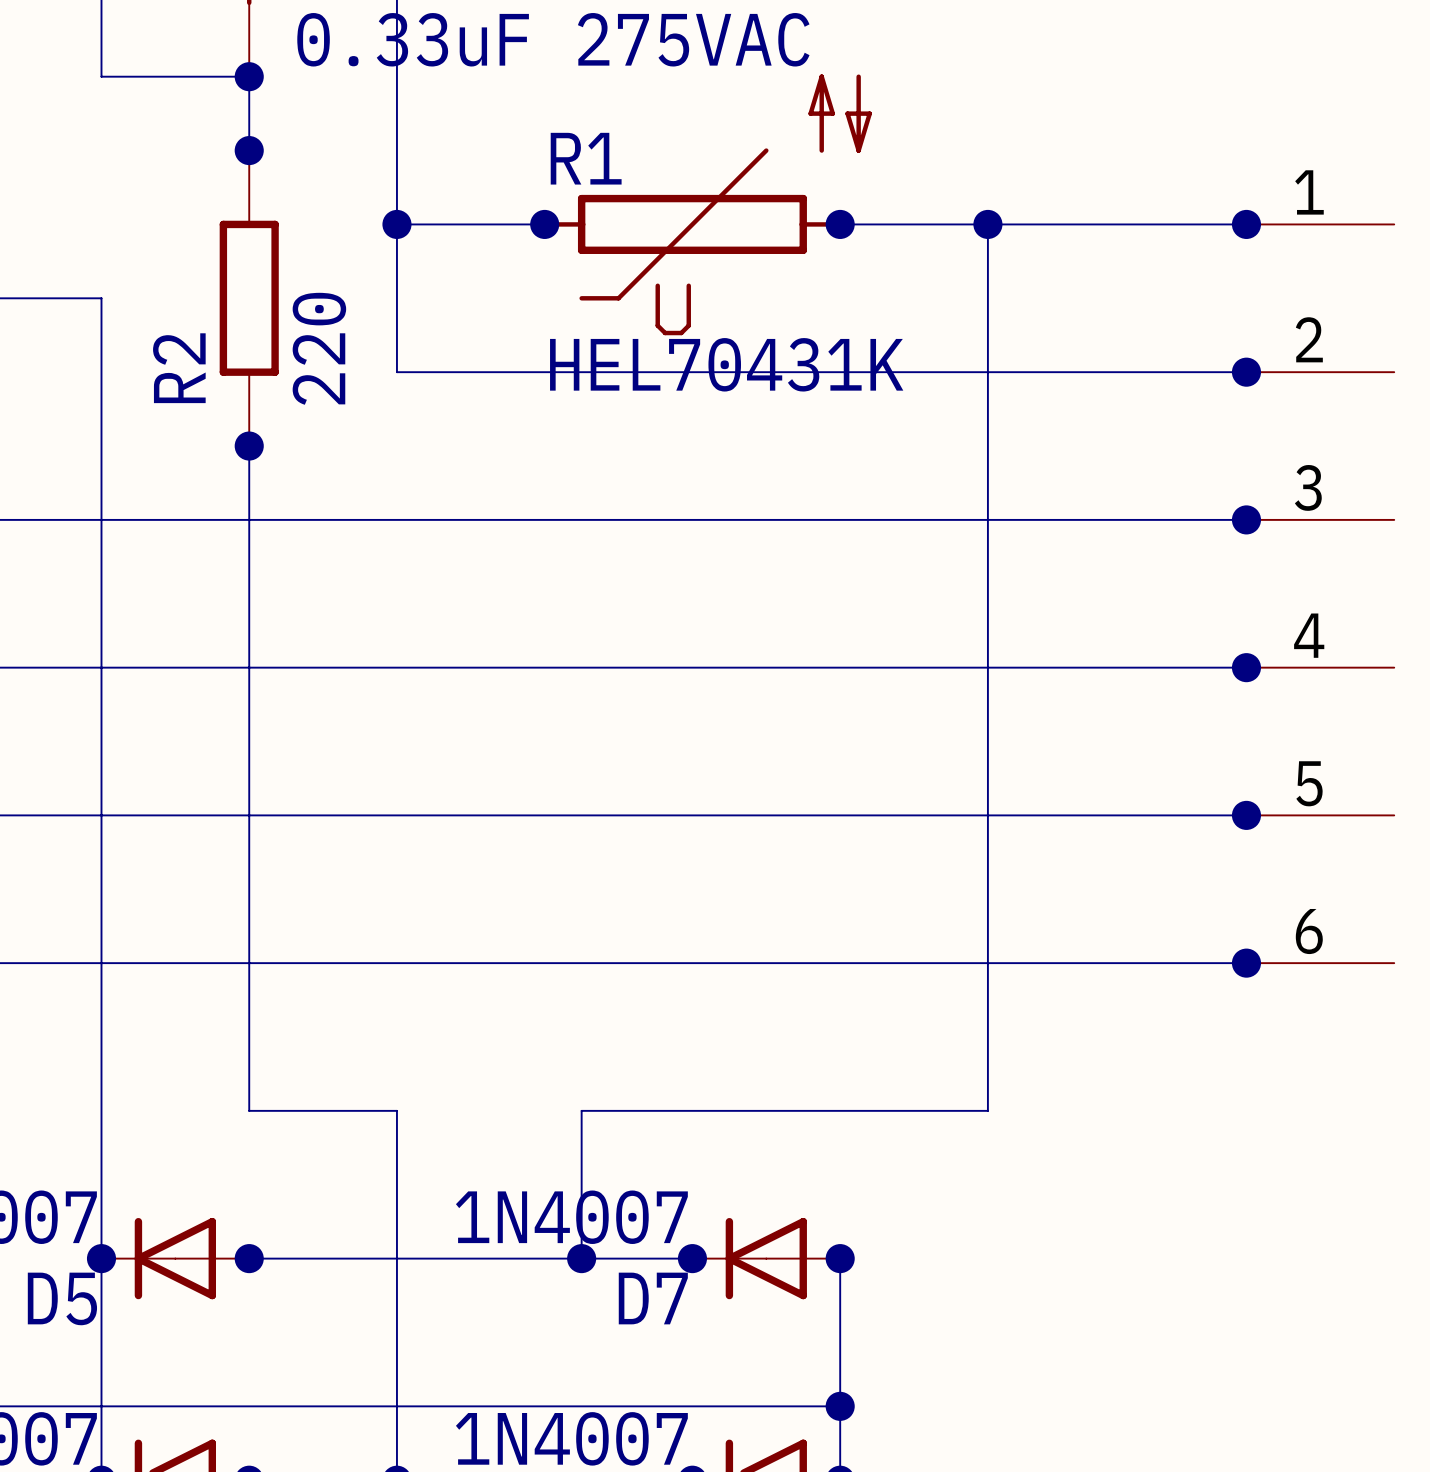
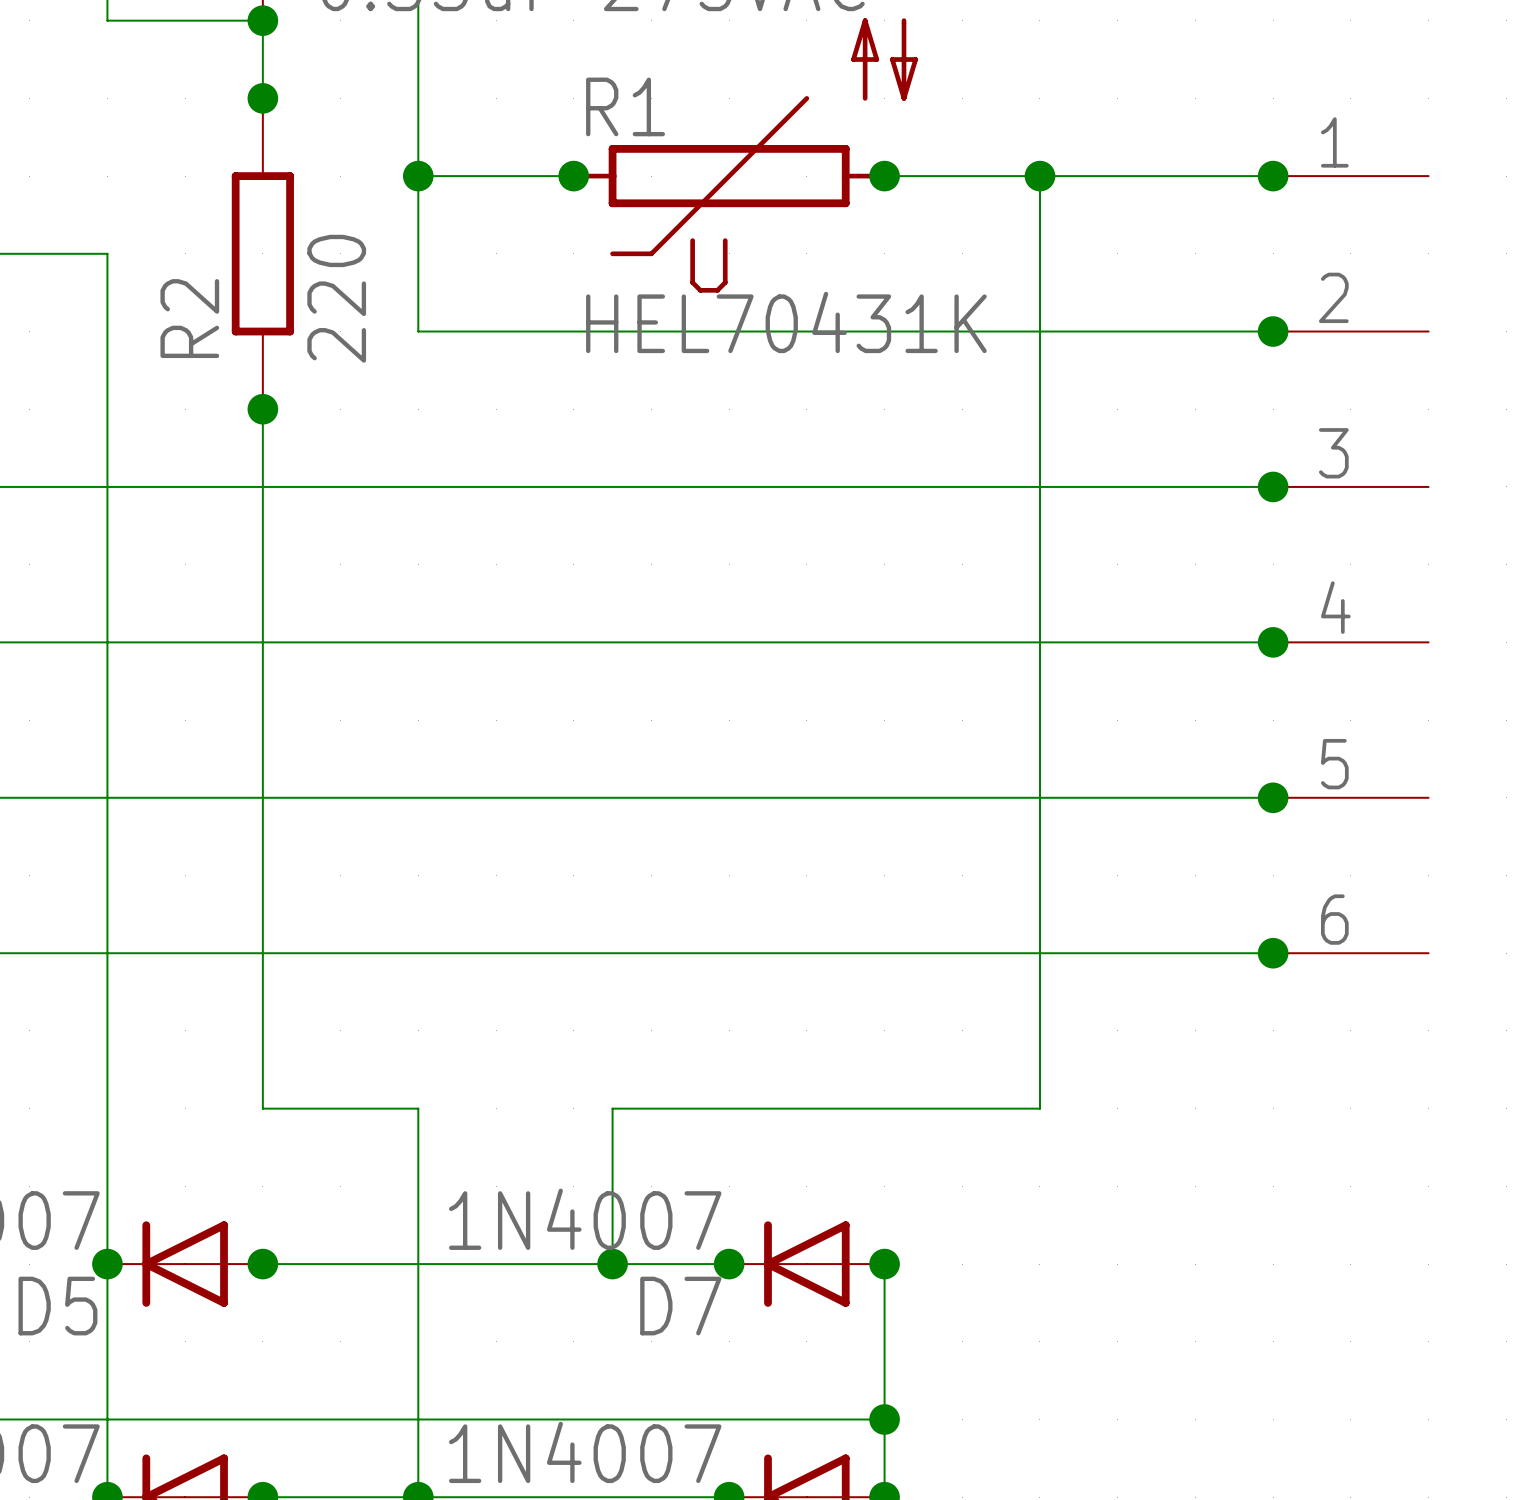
junction position: (1246, 224) -> (1273, 176)
junction position: (1246, 372) -> (1273, 331)
junction position: (1246, 519) -> (1273, 486)
part position: (1320, 593) -> (1350, 564)
junction position: (1246, 667) -> (1273, 642)
junction position: (1246, 815) -> (1273, 797)
junction position: (1246, 963) -> (1273, 953)

